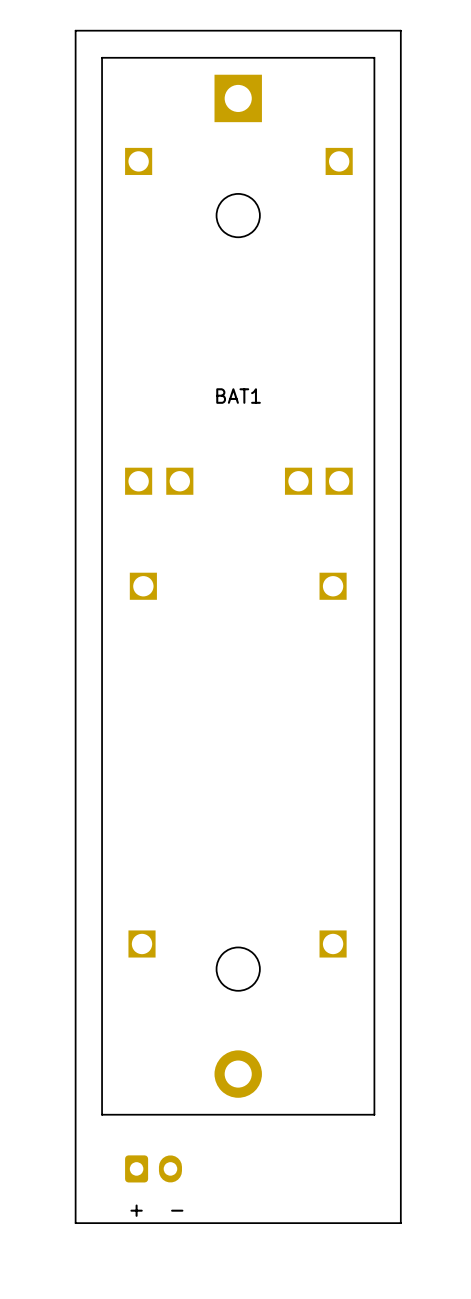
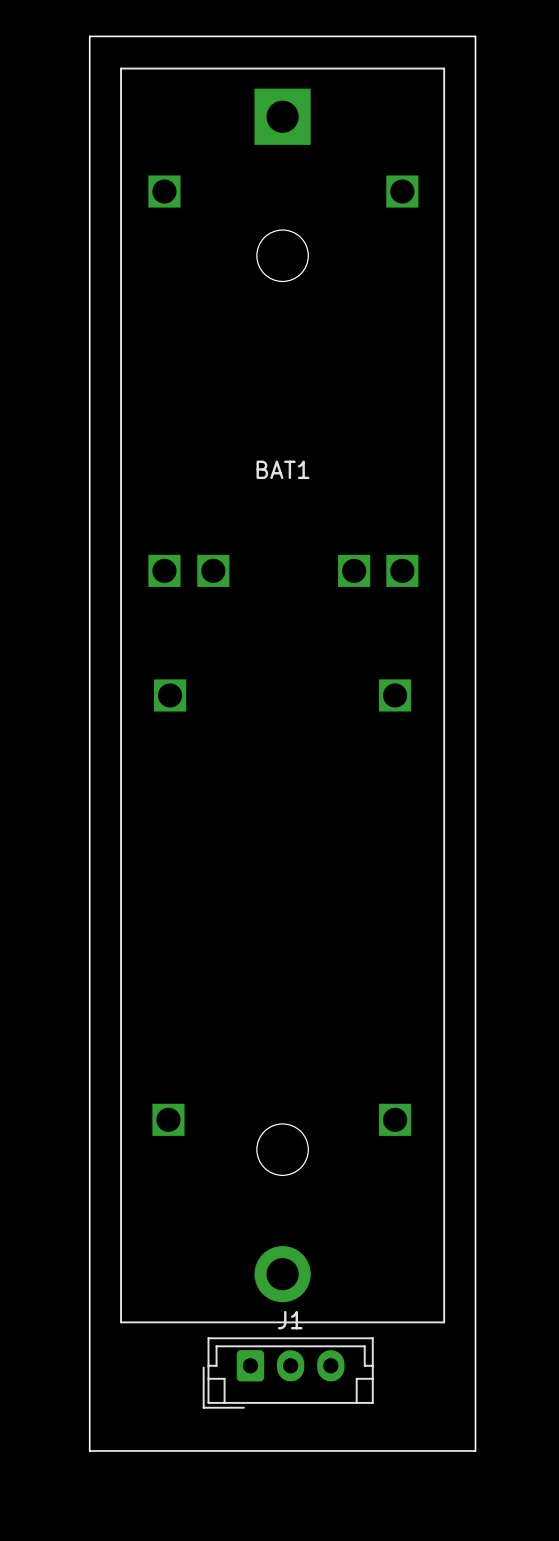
J1: none -> (288, 1373)
part: (153, 1168) -> none
text: + (136, 1210) -> none
text: - (177, 1210) -> none

